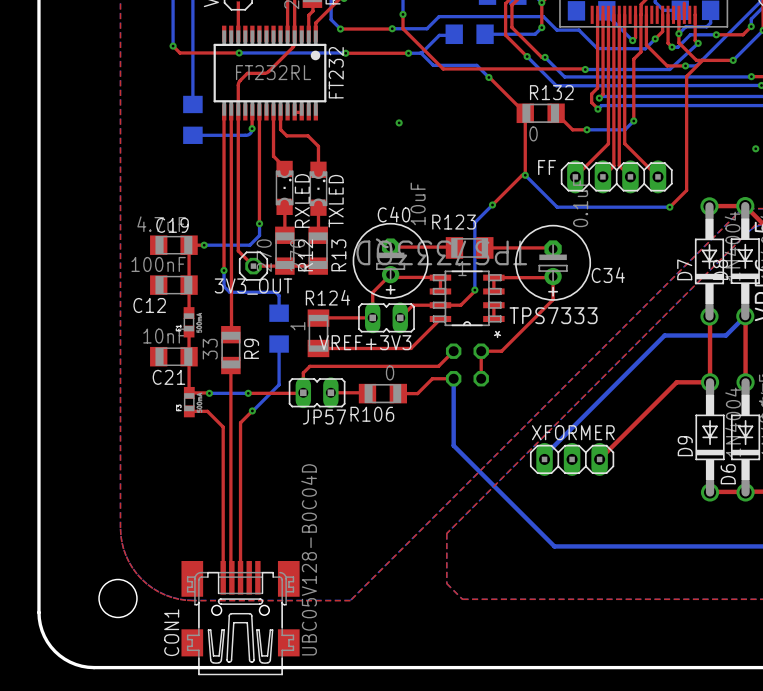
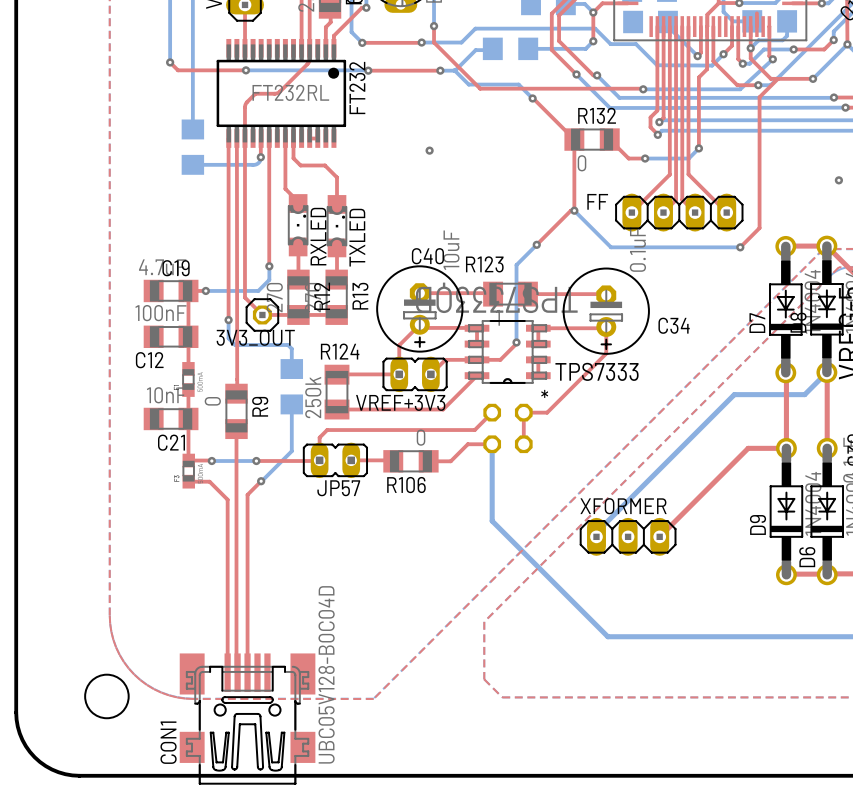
R124 value: 1 (297, 326) -> 250k (313, 397)
R9 value: 33 (210, 349) -> 0 (212, 401)

